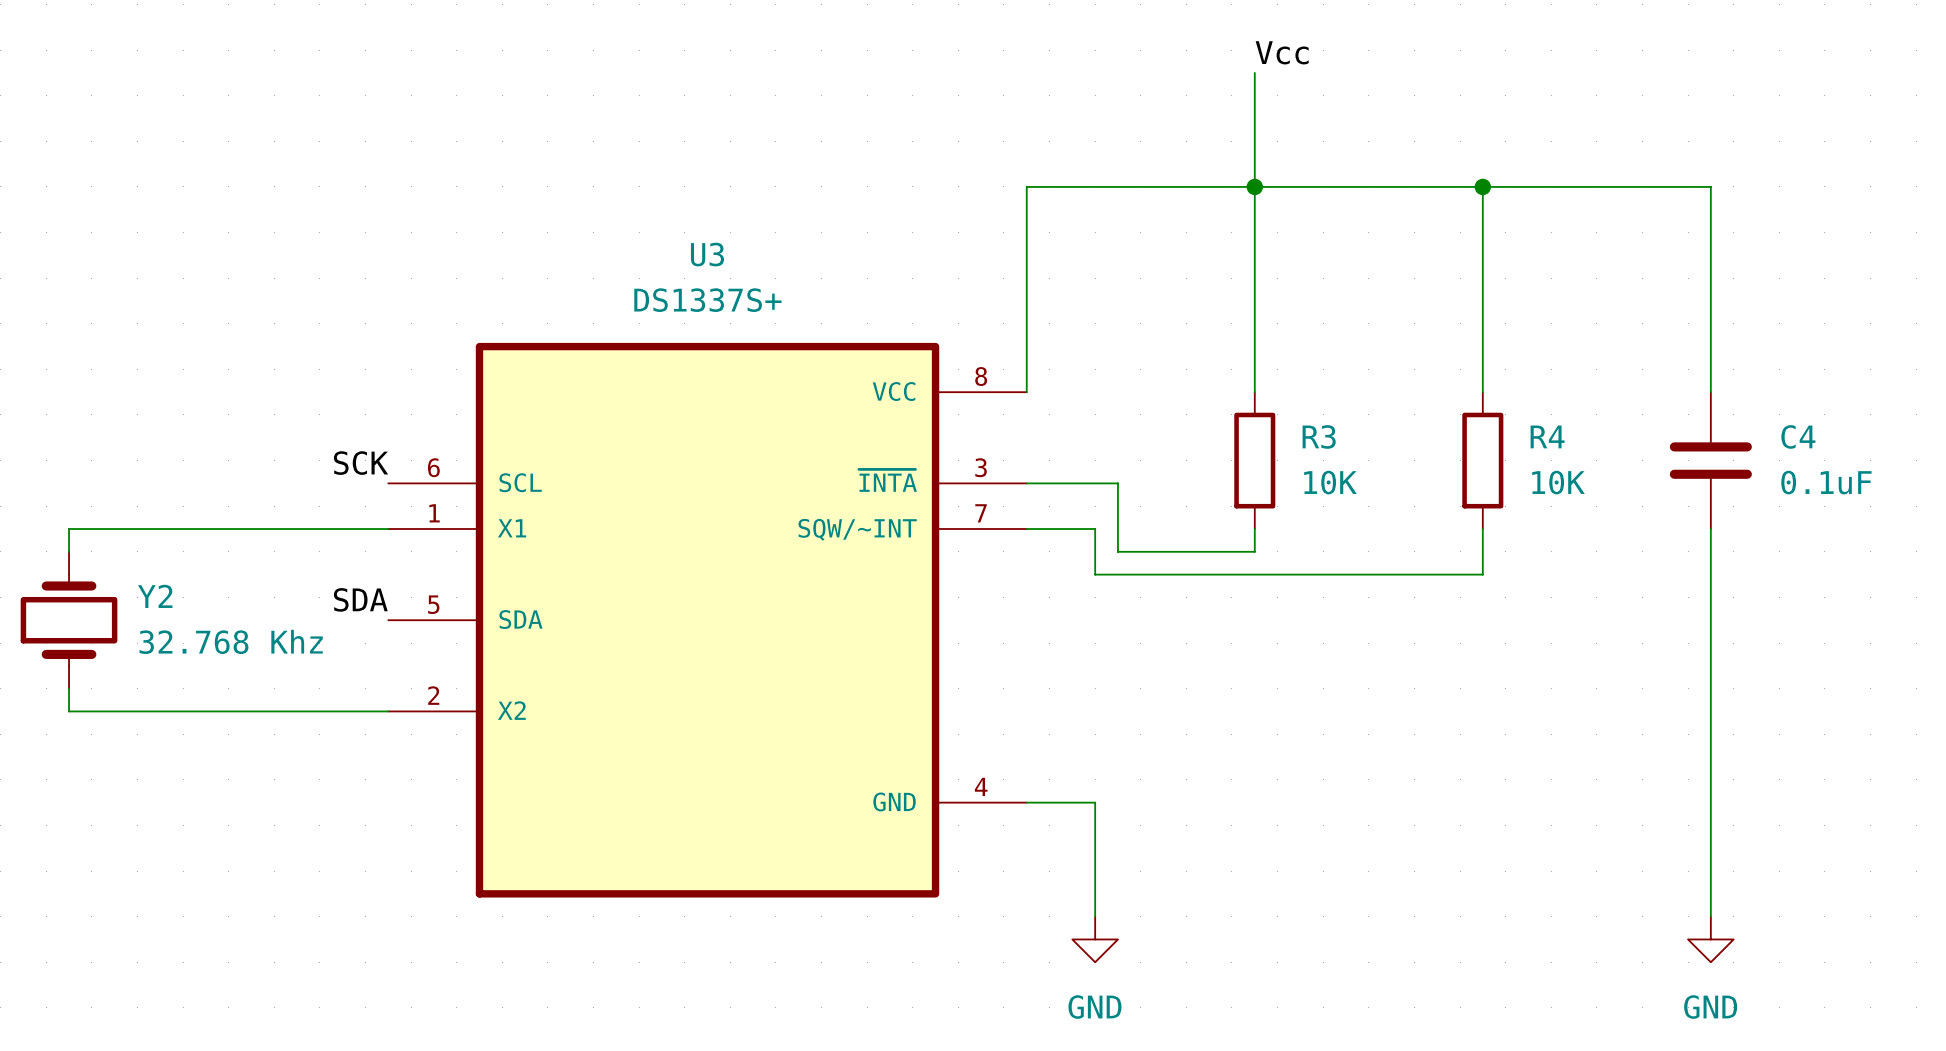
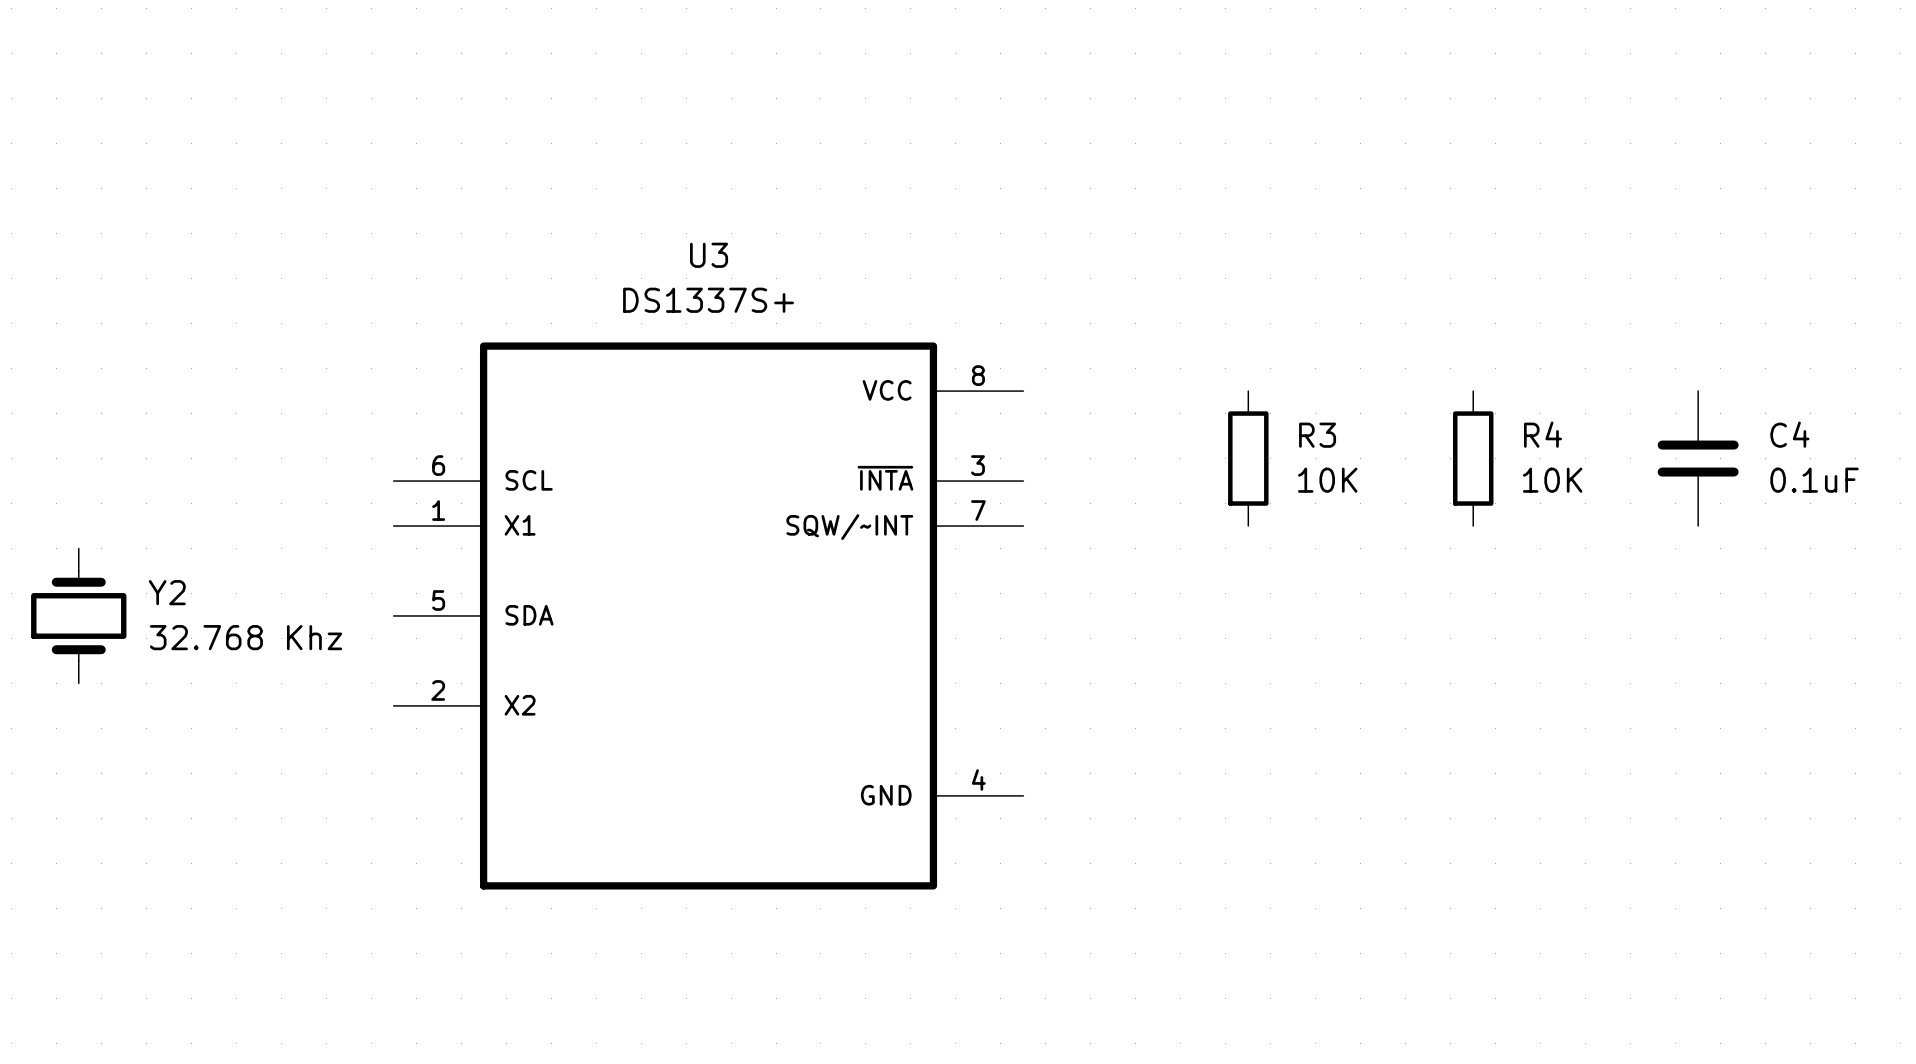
label: Vcc (1282, 52) -> none
wire: (1254, 72) (1254, 392) -> none
junction: (1254, 186) -> none
wire: (1482, 186) (1482, 392) -> none
junction: (1482, 186) -> none
wire: (1026, 392) (1026, 186) (1710, 186) (1710, 392) -> none
label: SCK (361, 463) -> none
wire: (1026, 483) (1117, 483) (1117, 551) (1254, 551) (1254, 529) -> none
wire: (388, 529) (69, 529) (69, 551) -> none
wire: (1026, 529) (1095, 529) (1095, 574) (1482, 574) (1482, 529) -> none
wire: (1710, 529) (1710, 916) -> none
label: SDA (360, 599) -> none
wire: (69, 688) (69, 711) (388, 711) -> none
wire: (1026, 802) (1095, 802) (1095, 916) -> none
power symbol: GND (1095, 939) -> none
power symbol: GND (1710, 939) -> none

